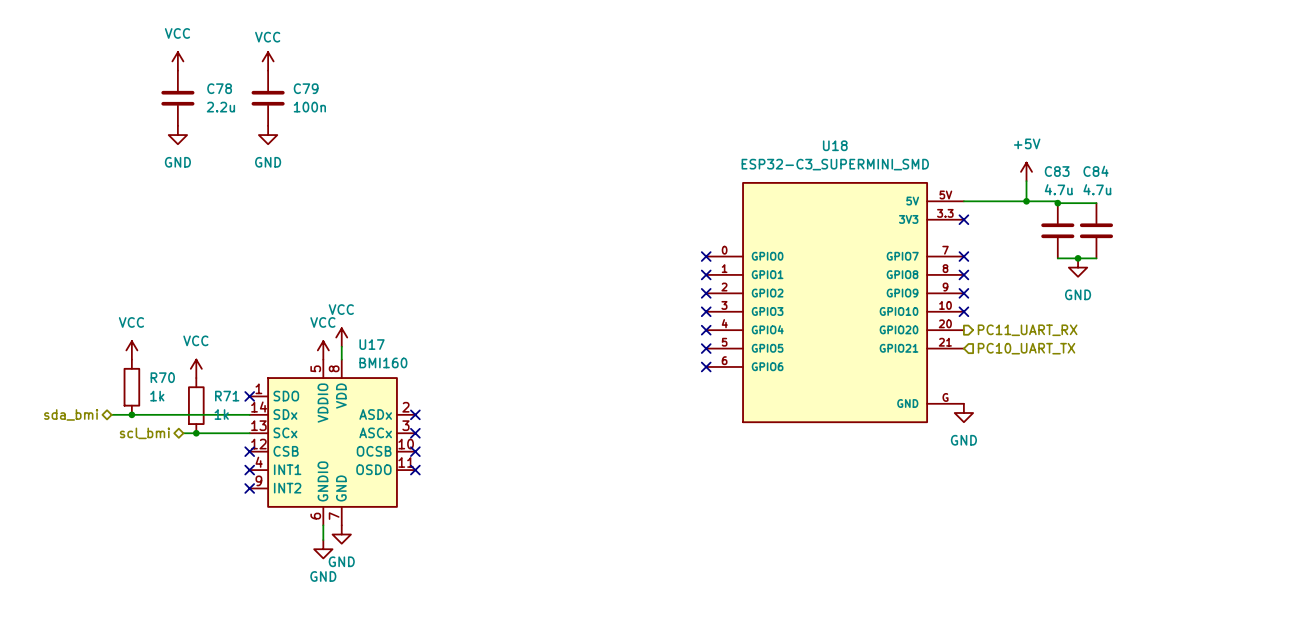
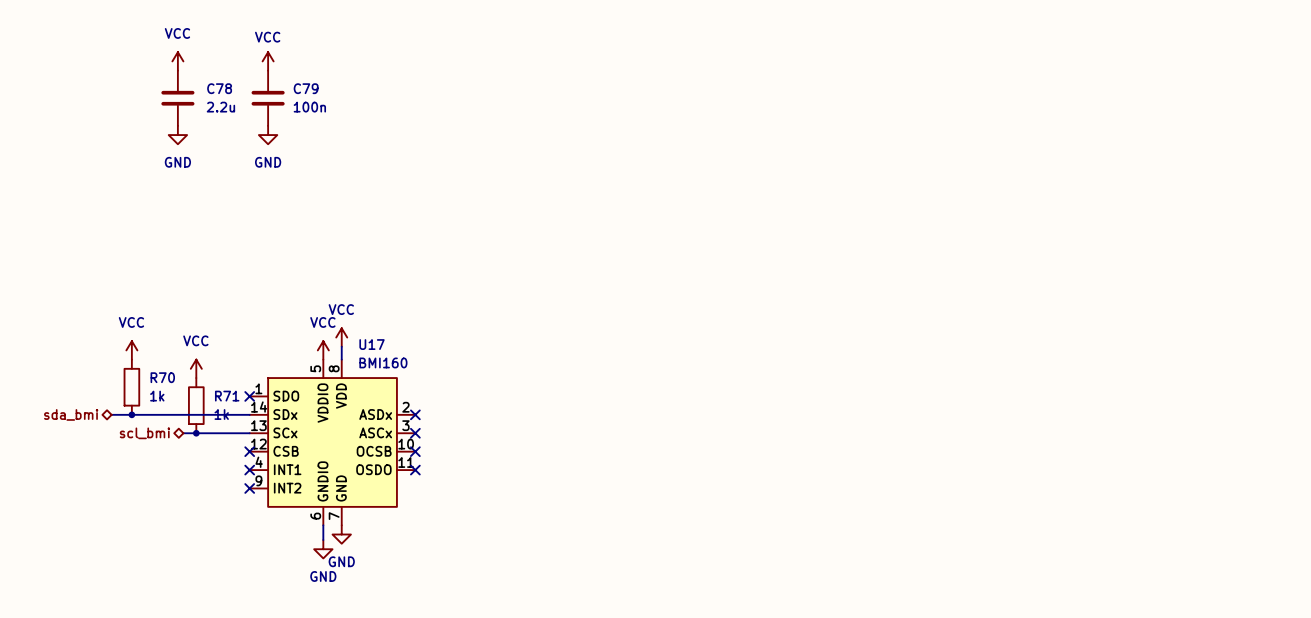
power symbol: +5V (1026, 171) -> none
wire: (1026, 181) (1026, 201) -> none
wire: (963, 201) (1096, 203) -> none
junction: (1026, 201) -> none
junction: (1057, 203) -> none
no-connect mark: (963, 219) -> none
C83: 4.7u (1057, 230) -> none
C84: 4.7u (1096, 230) -> none
no-connect mark: (706, 256) -> none
no-connect mark: (963, 256) -> none
wire: (1057, 258) (1096, 258) -> none
junction: (1078, 258) -> none
power symbol: GND (1078, 267) -> none
no-connect mark: (706, 274) -> none
no-connect mark: (963, 274) -> none
no-connect mark: (706, 293) -> none
no-connect mark: (963, 293) -> none
U18: ESP32-C3_SUPERMINI_SMD (835, 302) -> none
no-connect mark: (706, 311) -> none
no-connect mark: (963, 311) -> none
no-connect mark: (706, 330) -> none
hierarchical label: PC11_UART_RX (1027, 330) -> none
no-connect mark: (706, 348) -> none
hierarchical label: PC10_UART_TX (1026, 348) -> none
no-connect mark: (706, 366) -> none
power symbol: GND (963, 413) -> none

